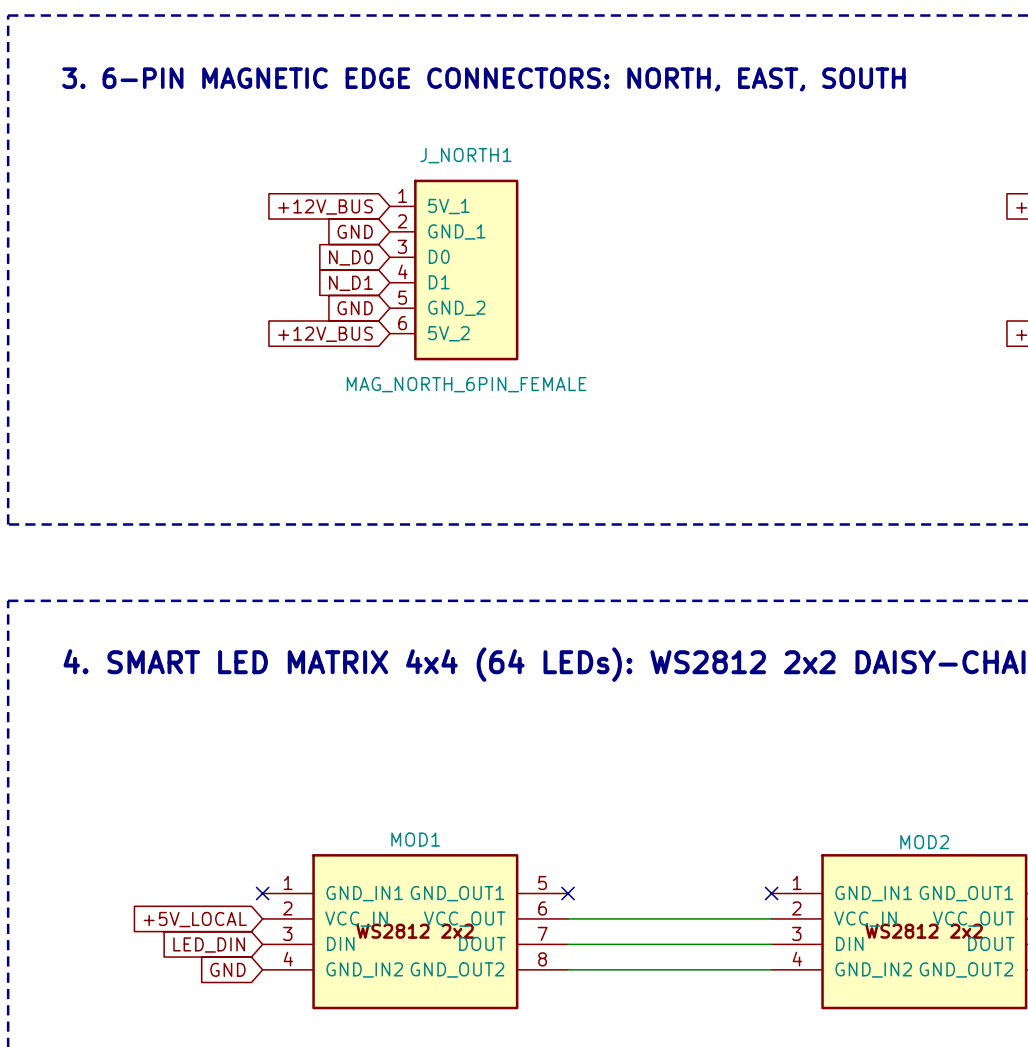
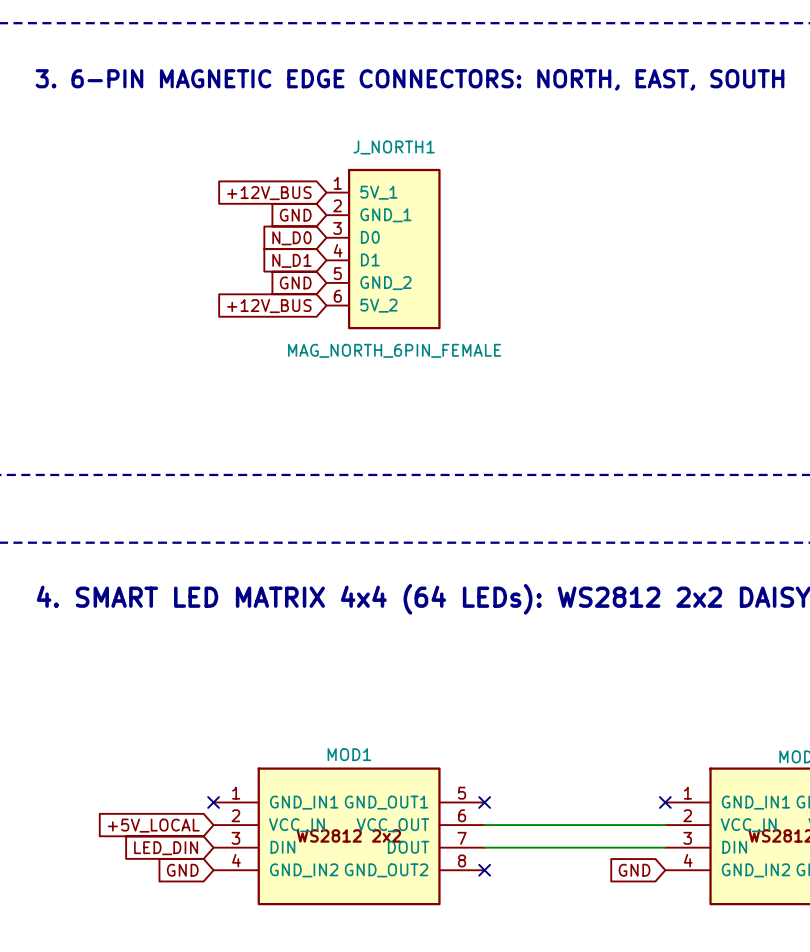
wire: (568, 969) (771, 969) -> none
no-connect mark: none -> (484, 870)
global label: none -> GND (634, 870)

